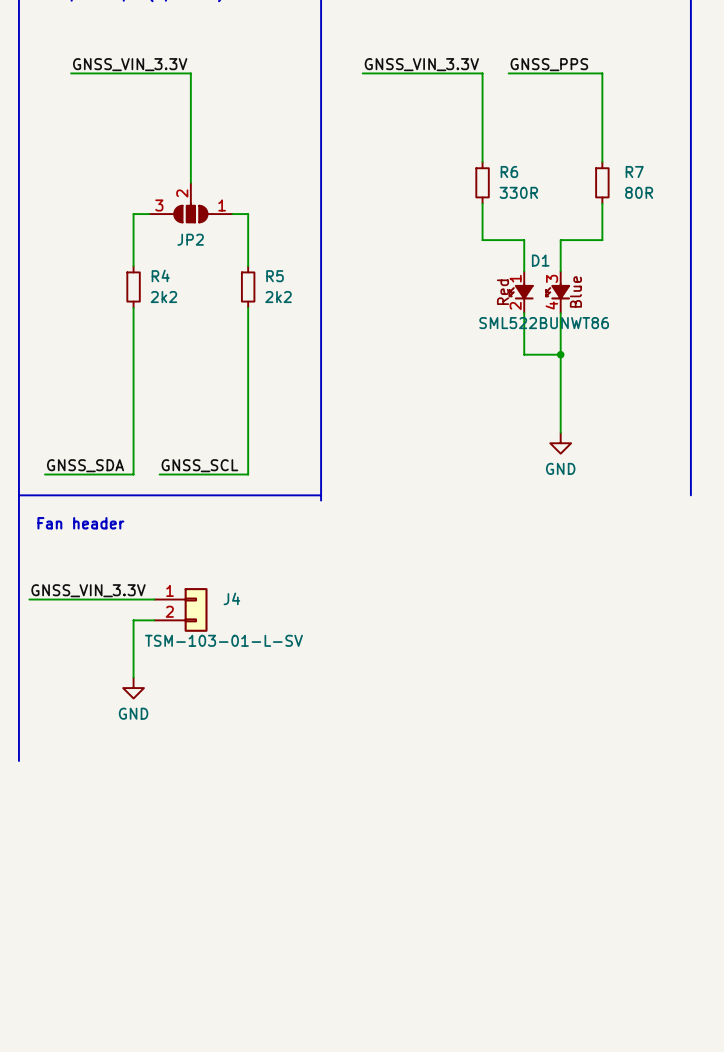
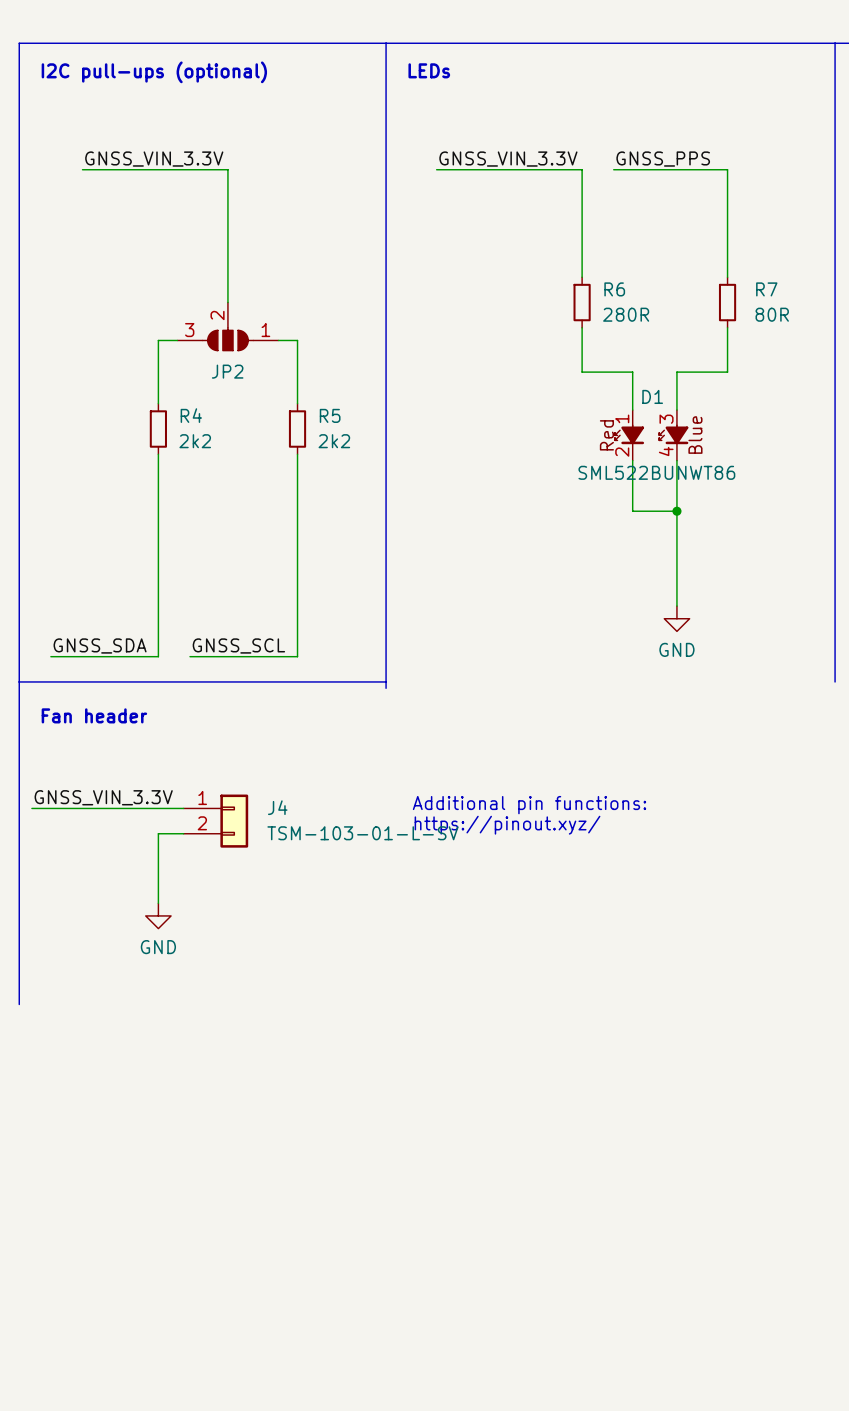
R6 value: 330R (518, 192) -> 280R (626, 314)
text: none -> Additional pin functions: (529, 805)
text: none -> https://pinout.xyz/ (507, 825)
J4 value position: TSM-103-01-L-SV (223, 640) -> TSM-103-01-L-SV (362, 833)

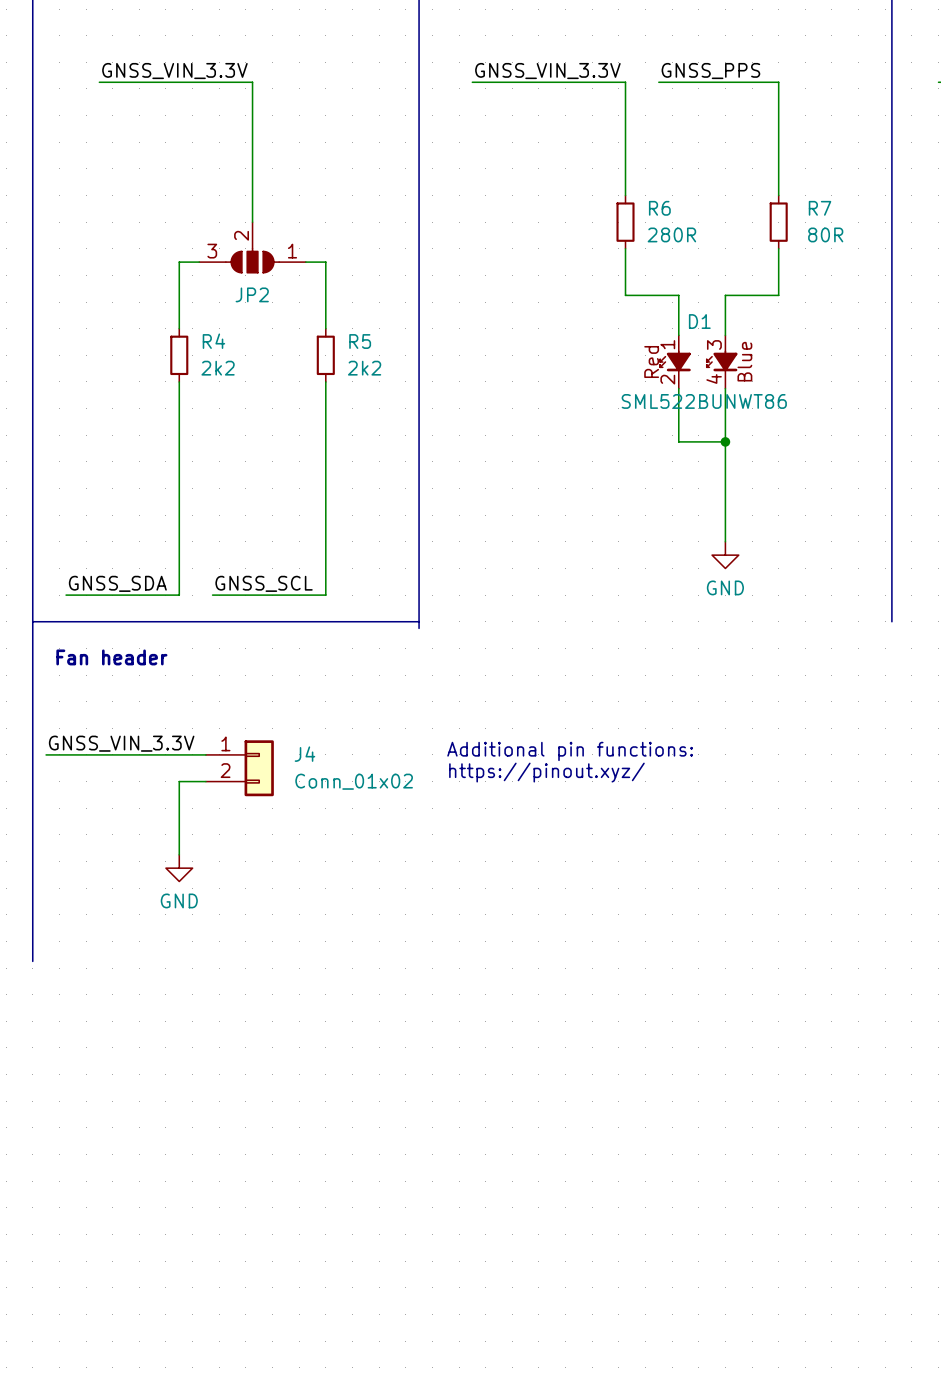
J4 value: TSM-103-01-L-SV (362, 833) -> Conn_01x02 (354, 781)

